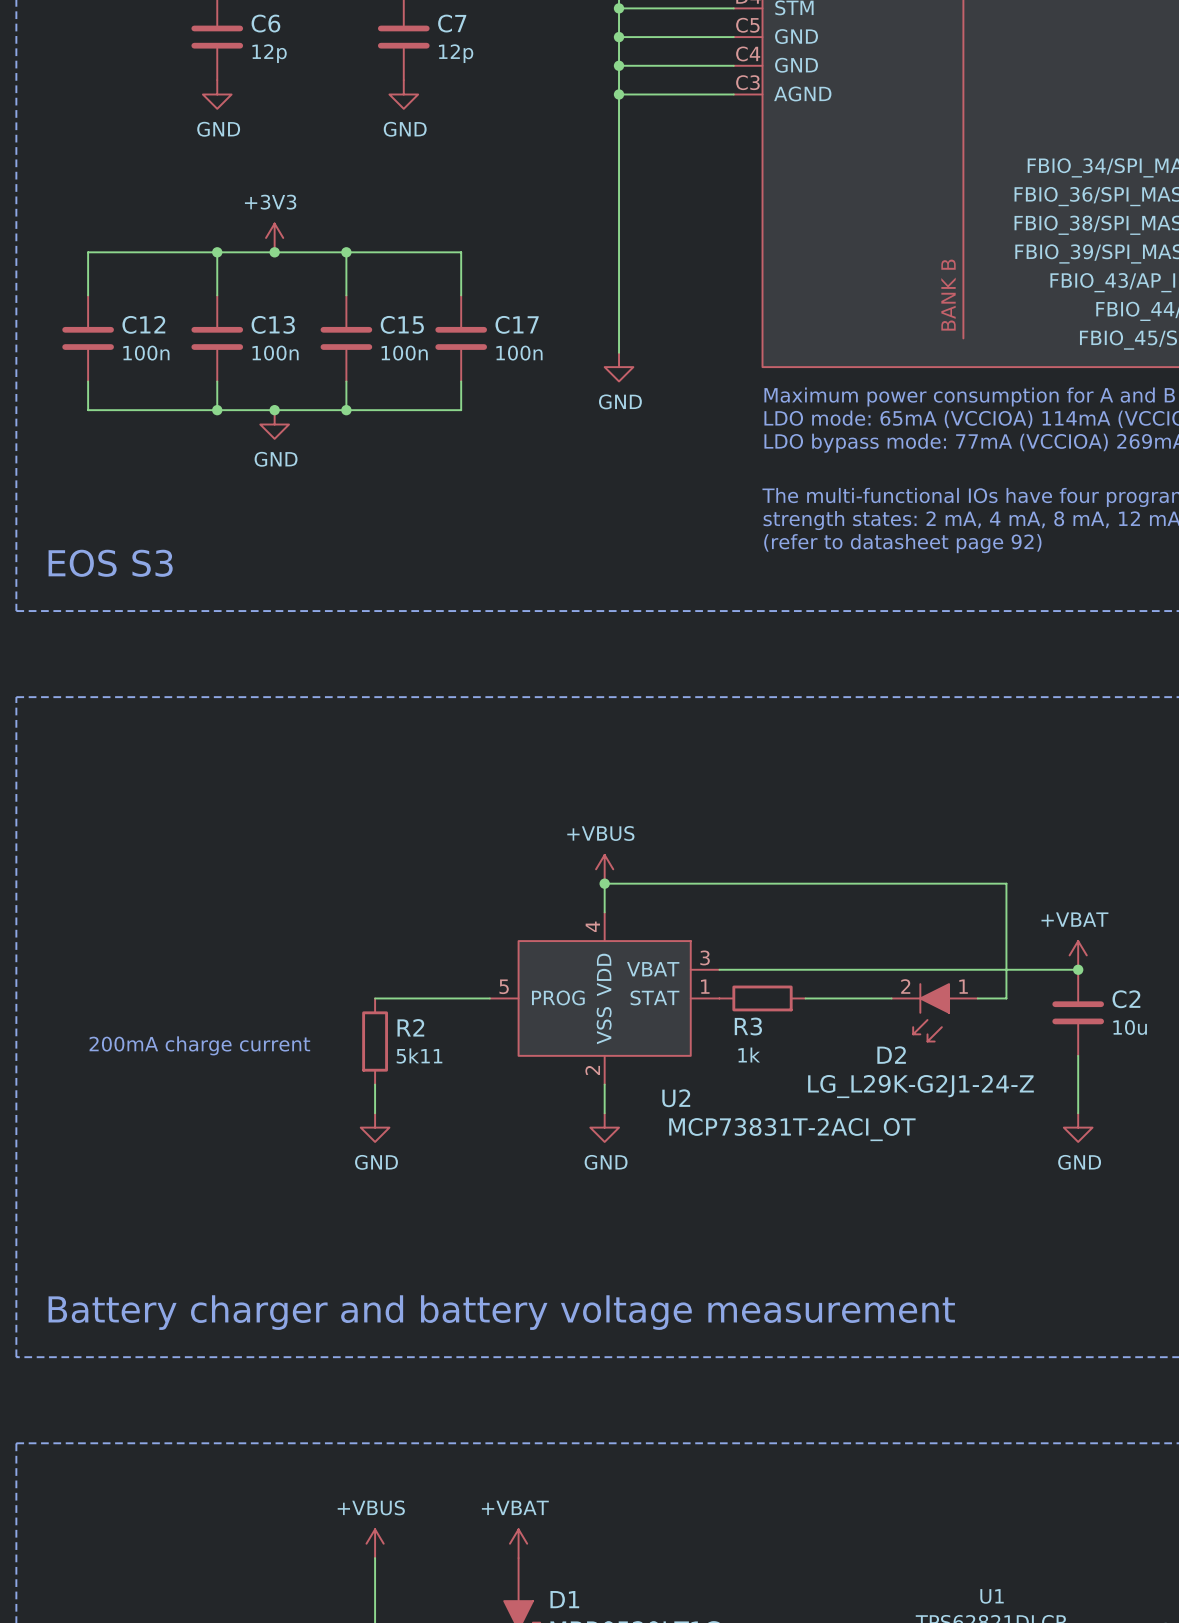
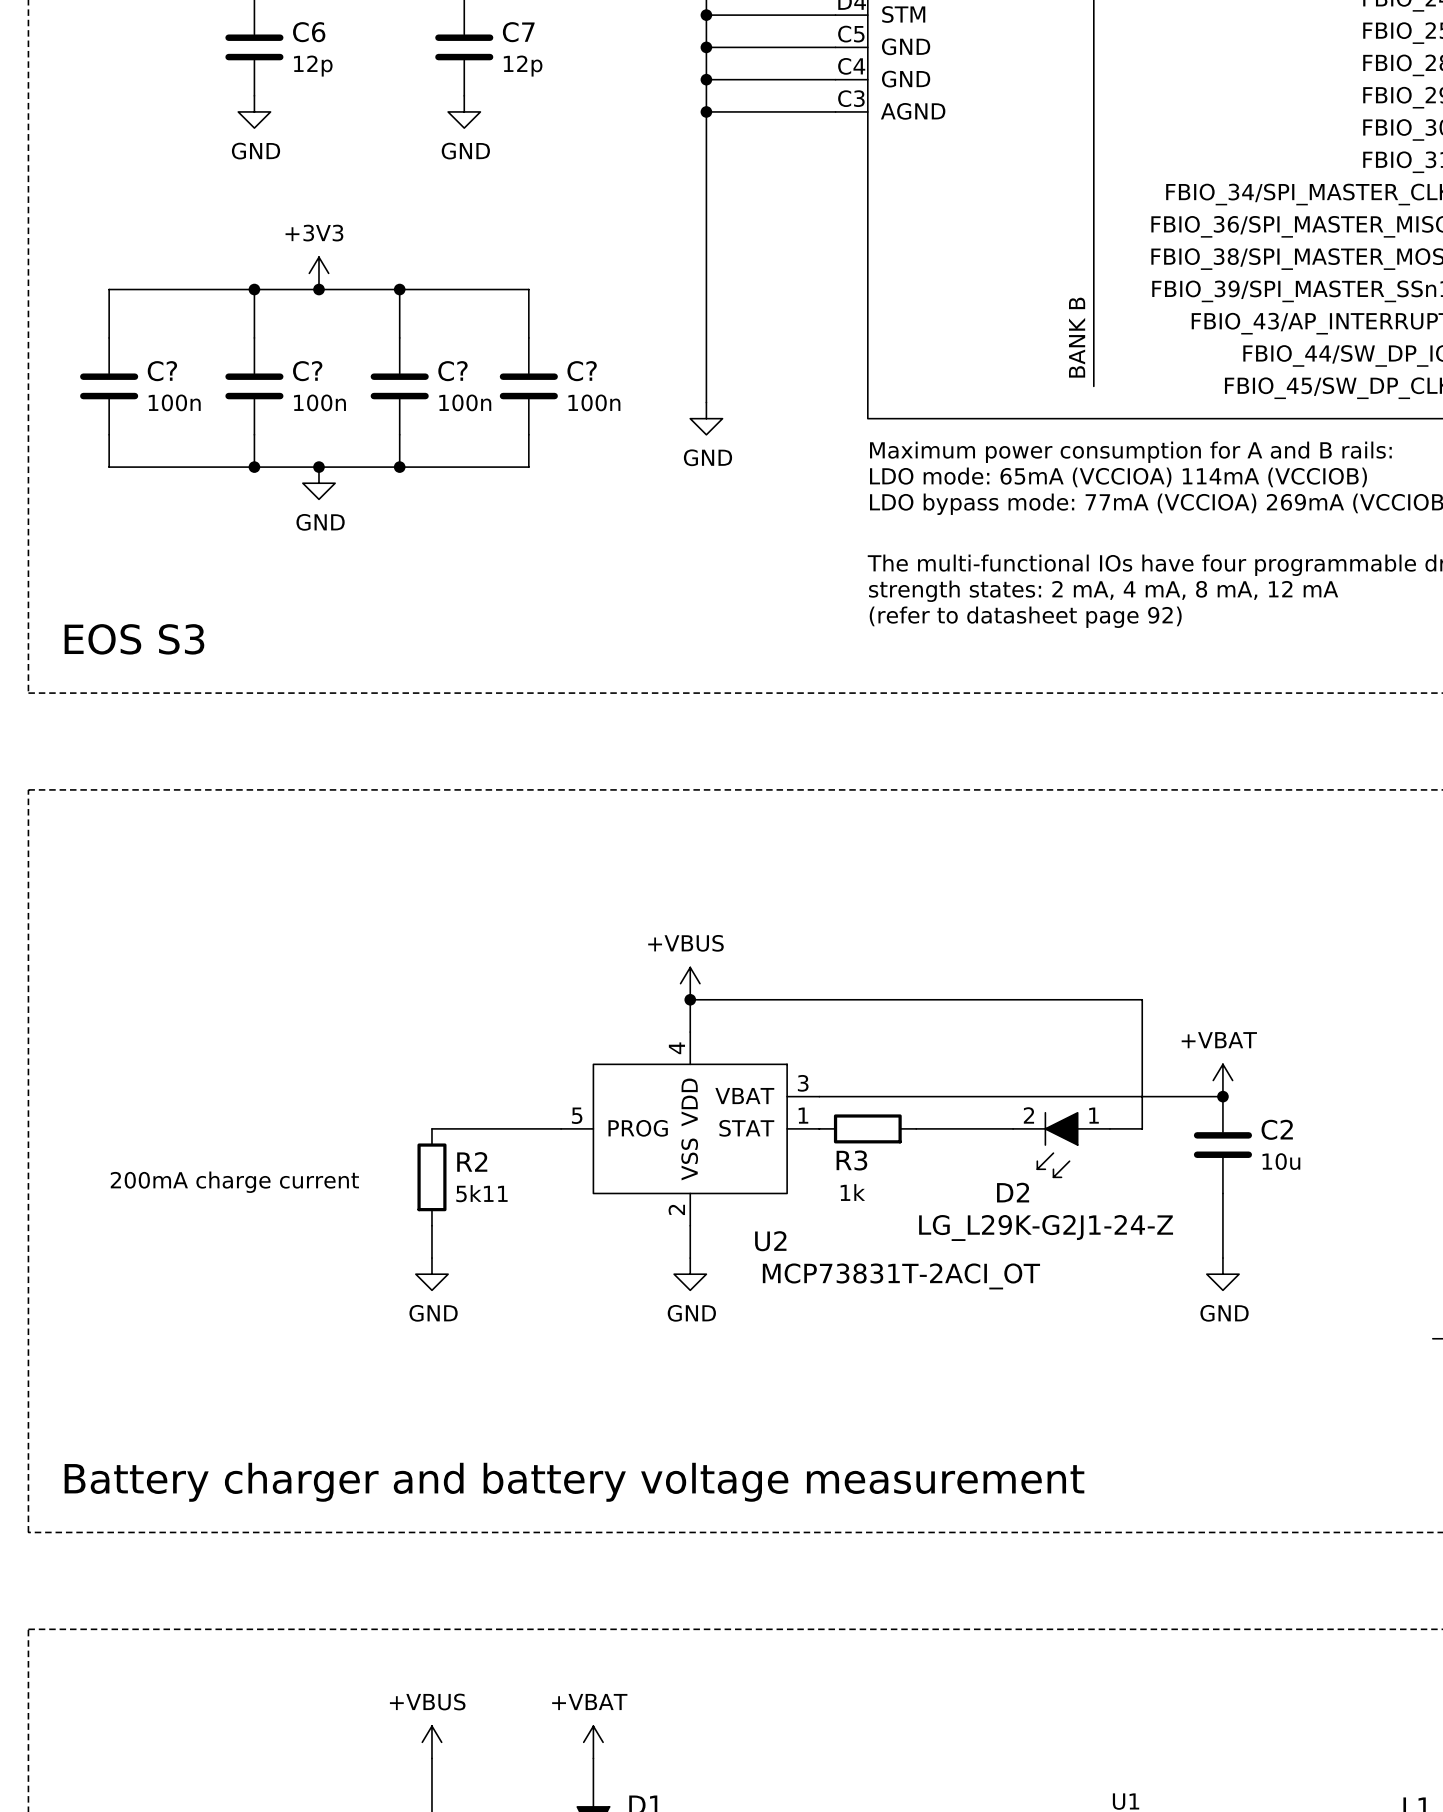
C12 name: C12 (143, 324) -> C? (162, 371)
C13 name: C13 (273, 324) -> C? (307, 371)
C15 name: C15 (402, 324) -> C? (452, 371)
C17 name: C17 (517, 324) -> C? (582, 371)

